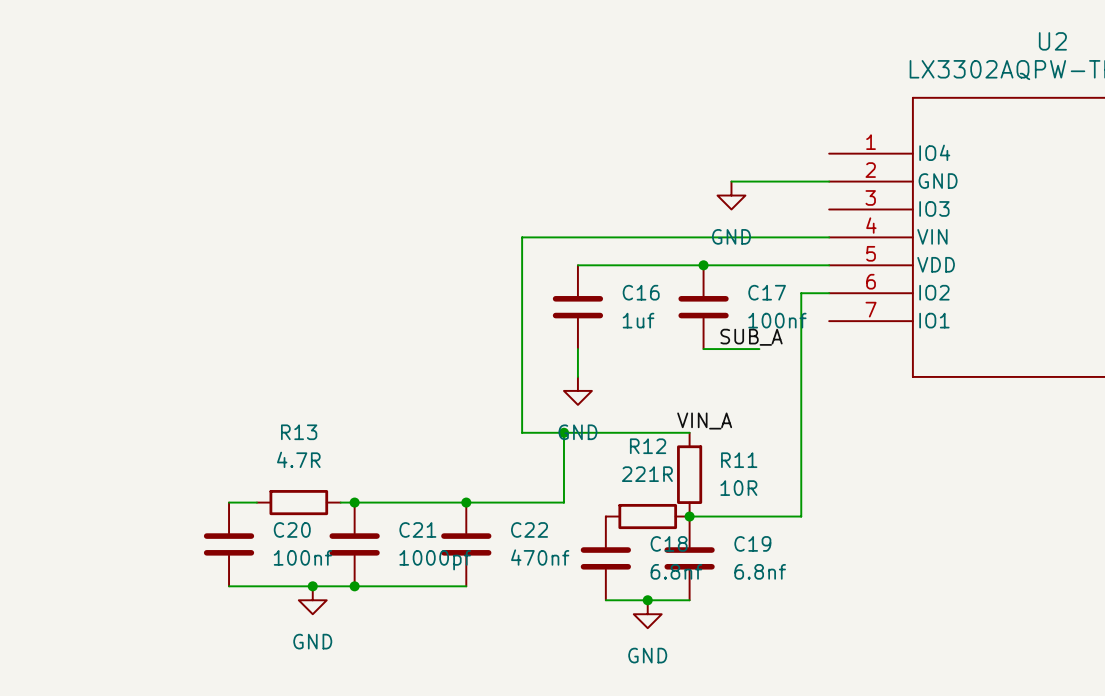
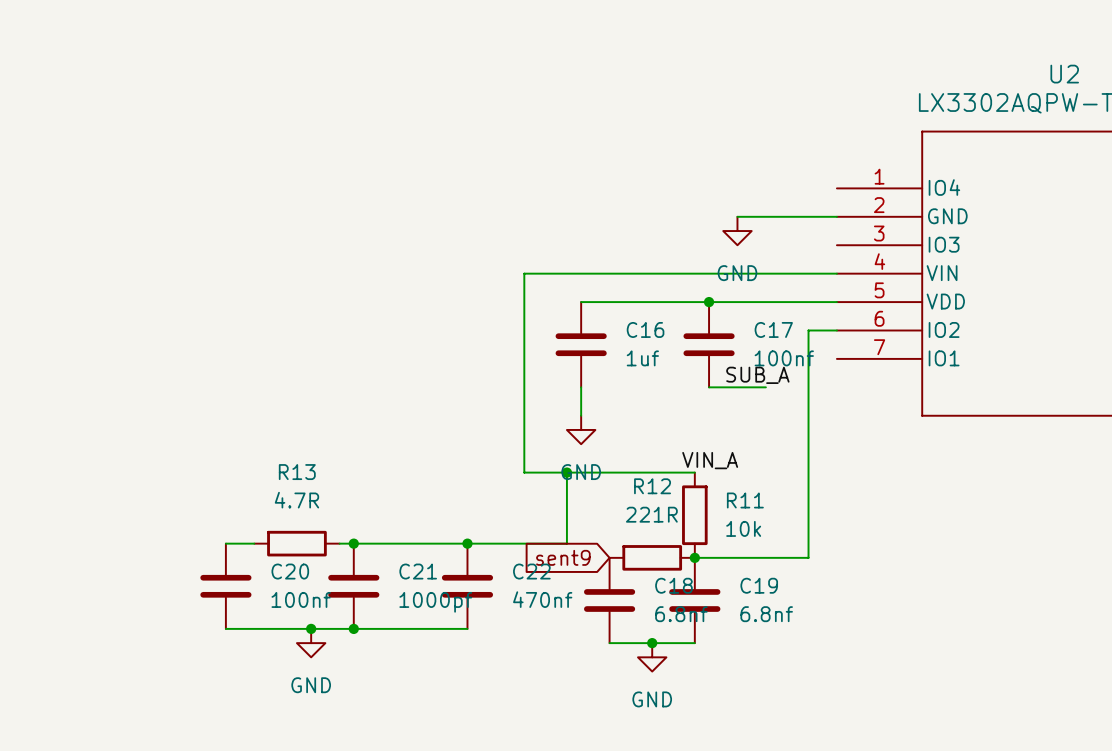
R11 value: 10R (738, 488) -> 10k (743, 528)
global label: none -> sent9 (563, 557)

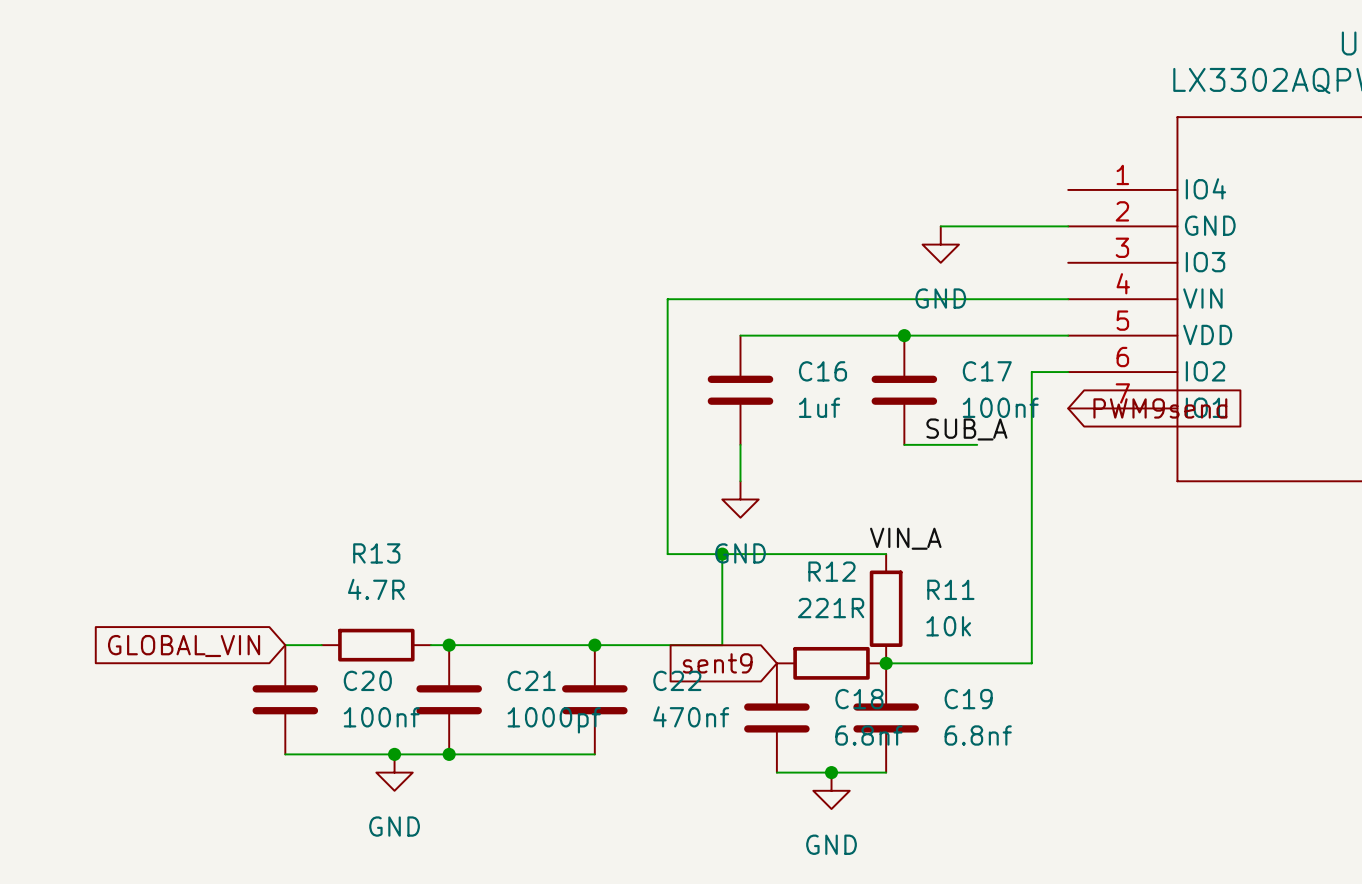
global label: none -> PWM9send (1160, 408)
global label: none -> GLOBAL_VIN (184, 646)

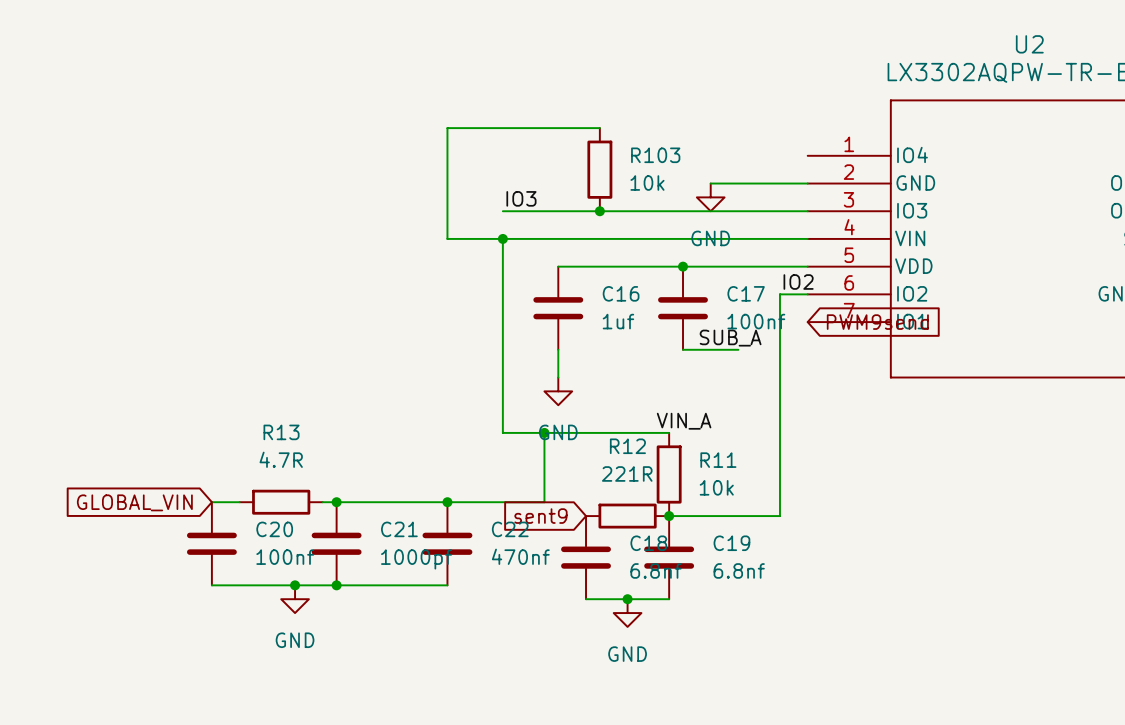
wire: none -> (599, 128) (447, 128) (447, 238) (502, 238)
R103: none -> 10k (599, 169)
label: none -> IO3 (521, 198)
wire: none -> (502, 211) (807, 211)
junction: none -> (599, 211)
junction: none -> (502, 238)
label: none -> IO2 (798, 282)

